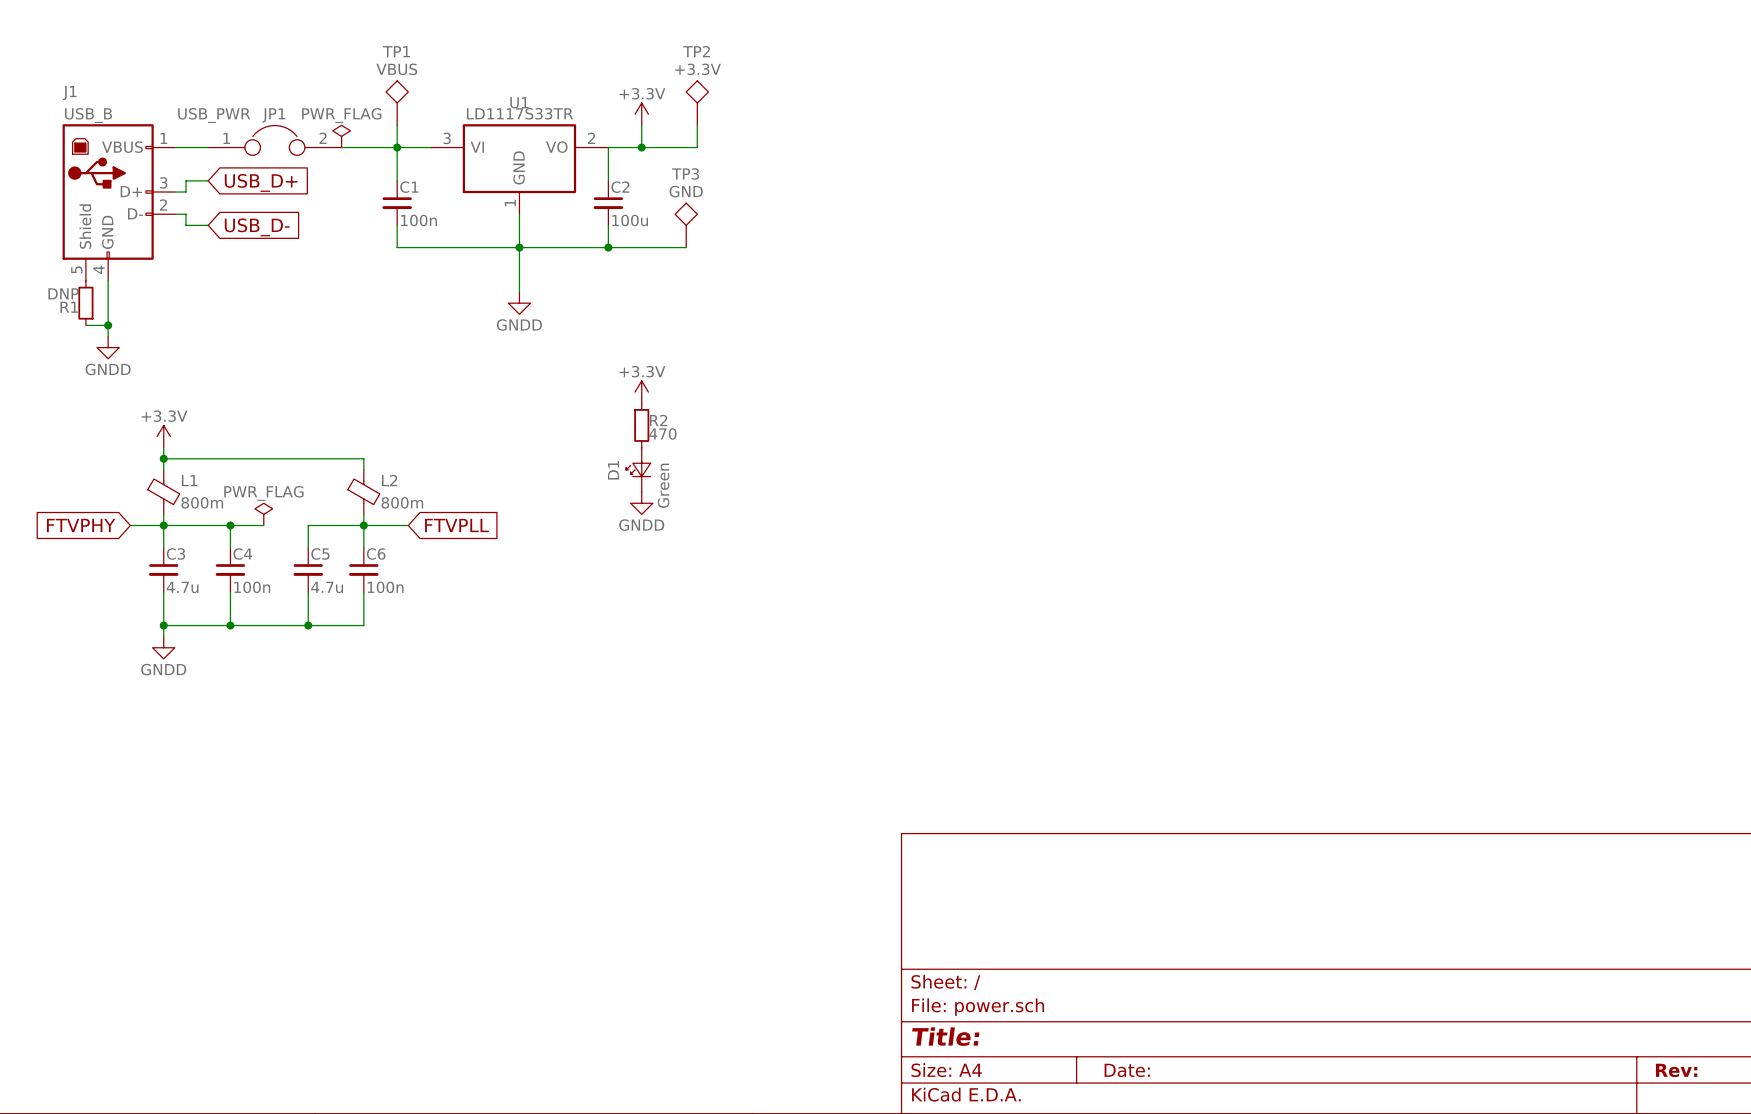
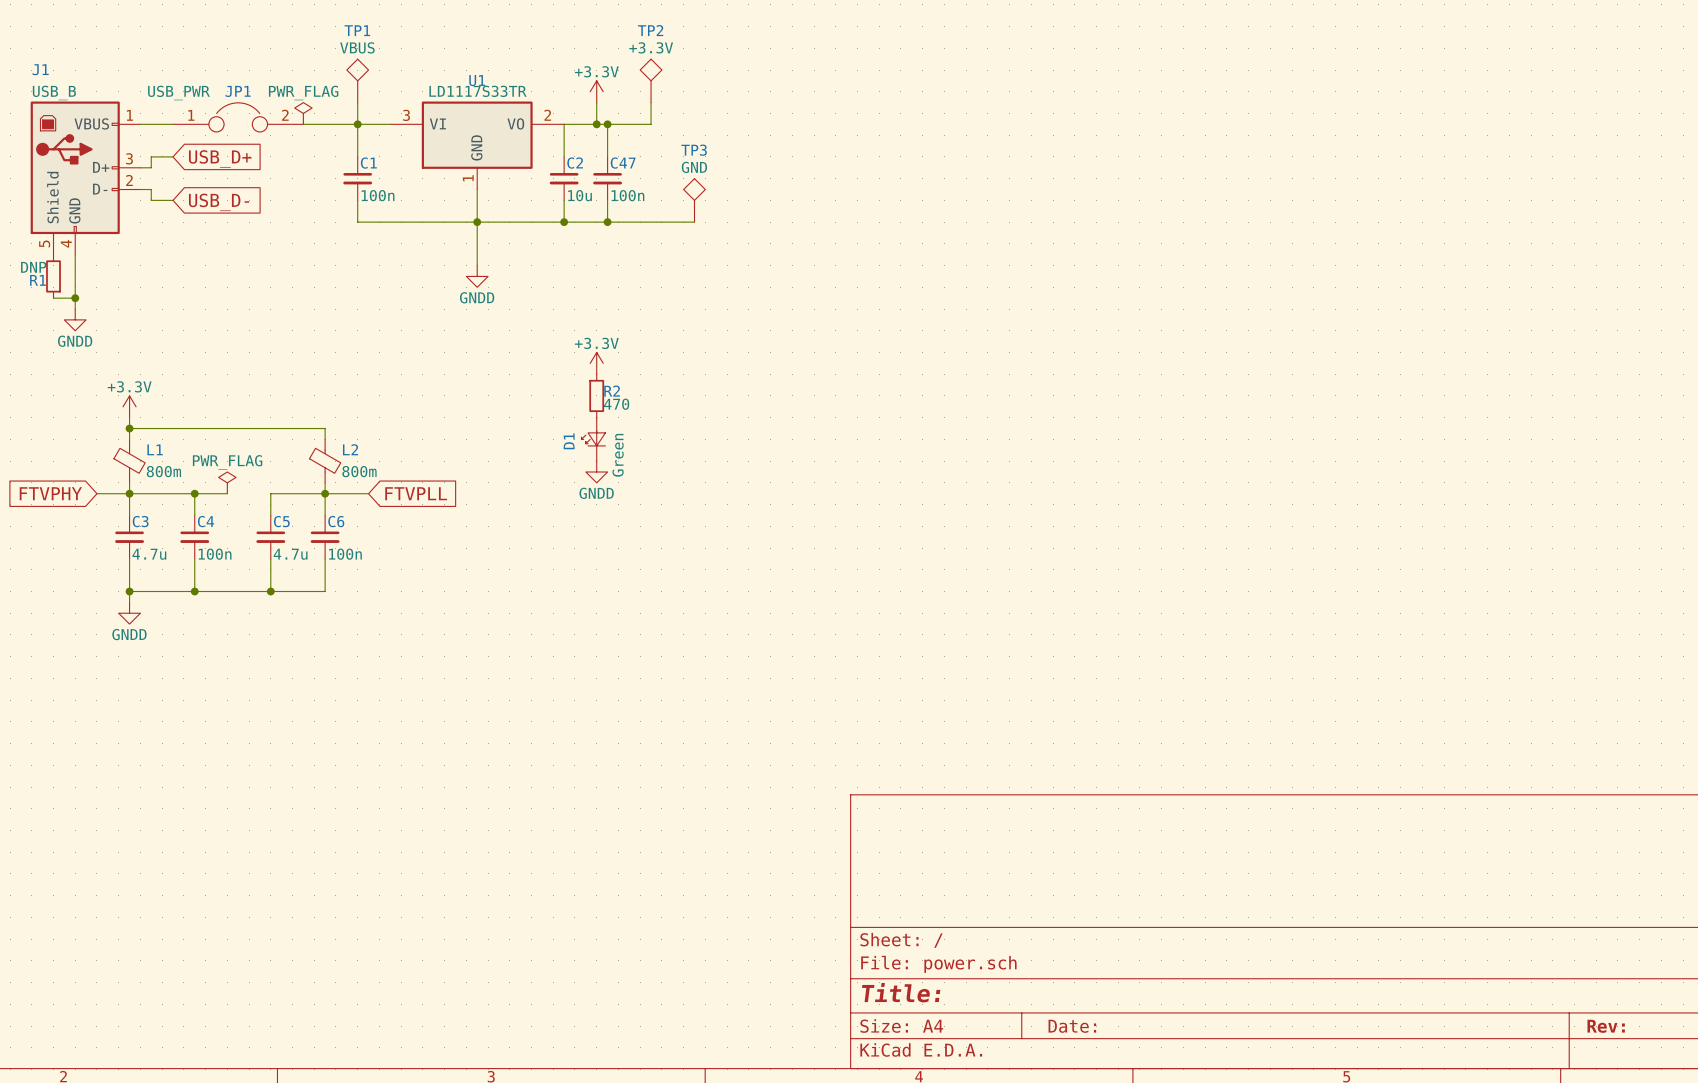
wire: none -> (607, 124) (607, 156)
junction: none -> (607, 124)
C47: none -> 100n (607, 178)
C2 value: 100u (630, 220) -> 10u (579, 195)
wire: none -> (607, 200) (607, 222)
TP3 position: (686, 225) -> (694, 200)
junction: none -> (607, 222)
wire: none -> (640, 222) (694, 222)

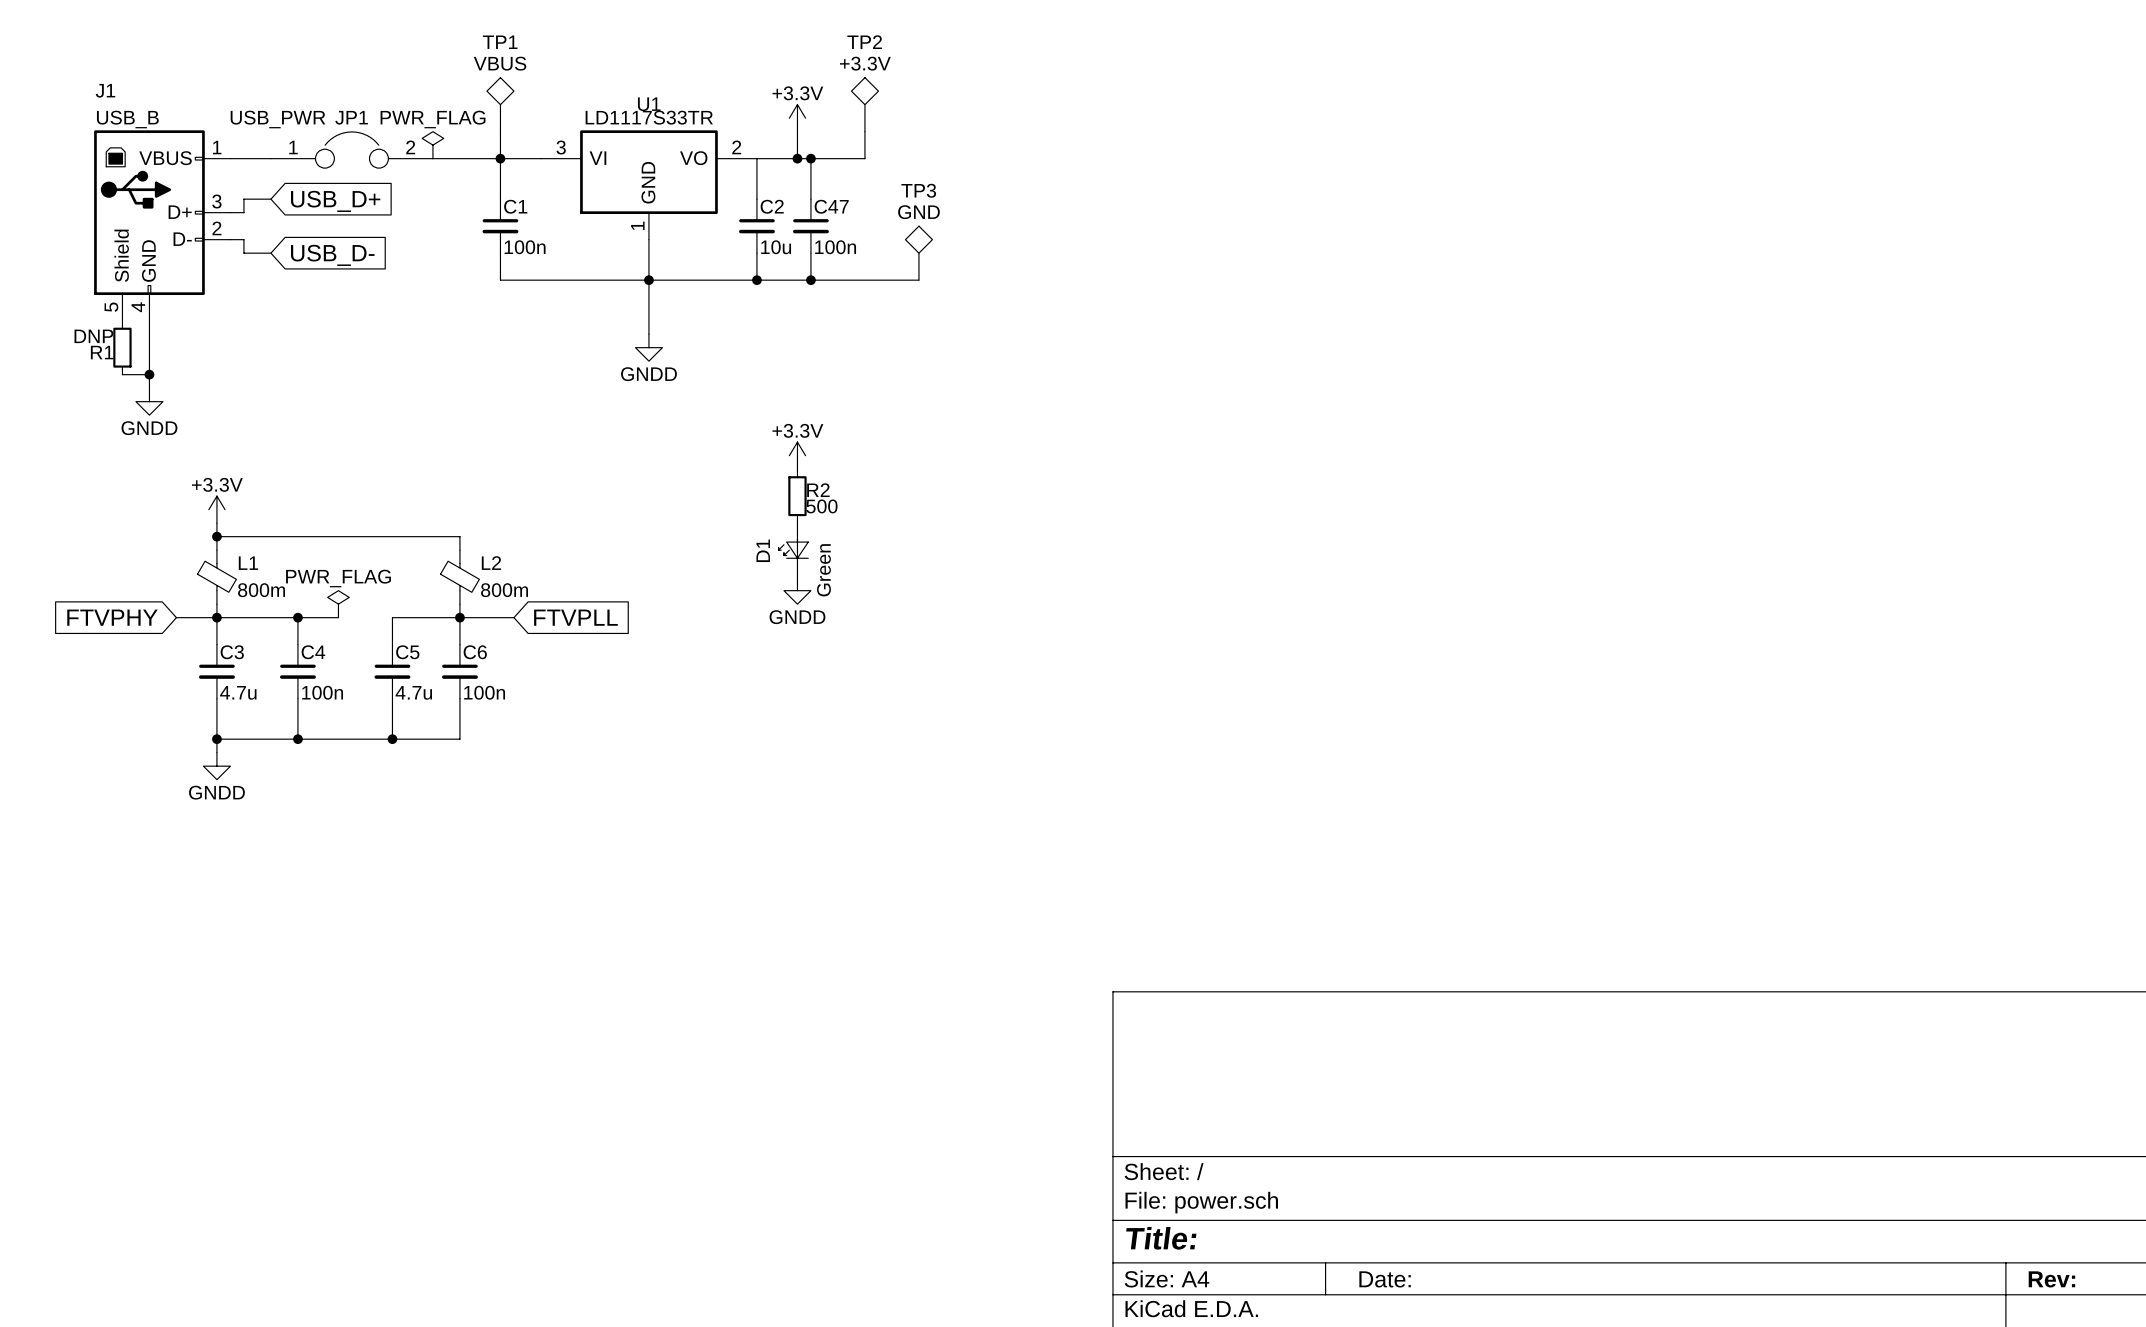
R2 value: 470 (616, 404) -> 500 (821, 506)

